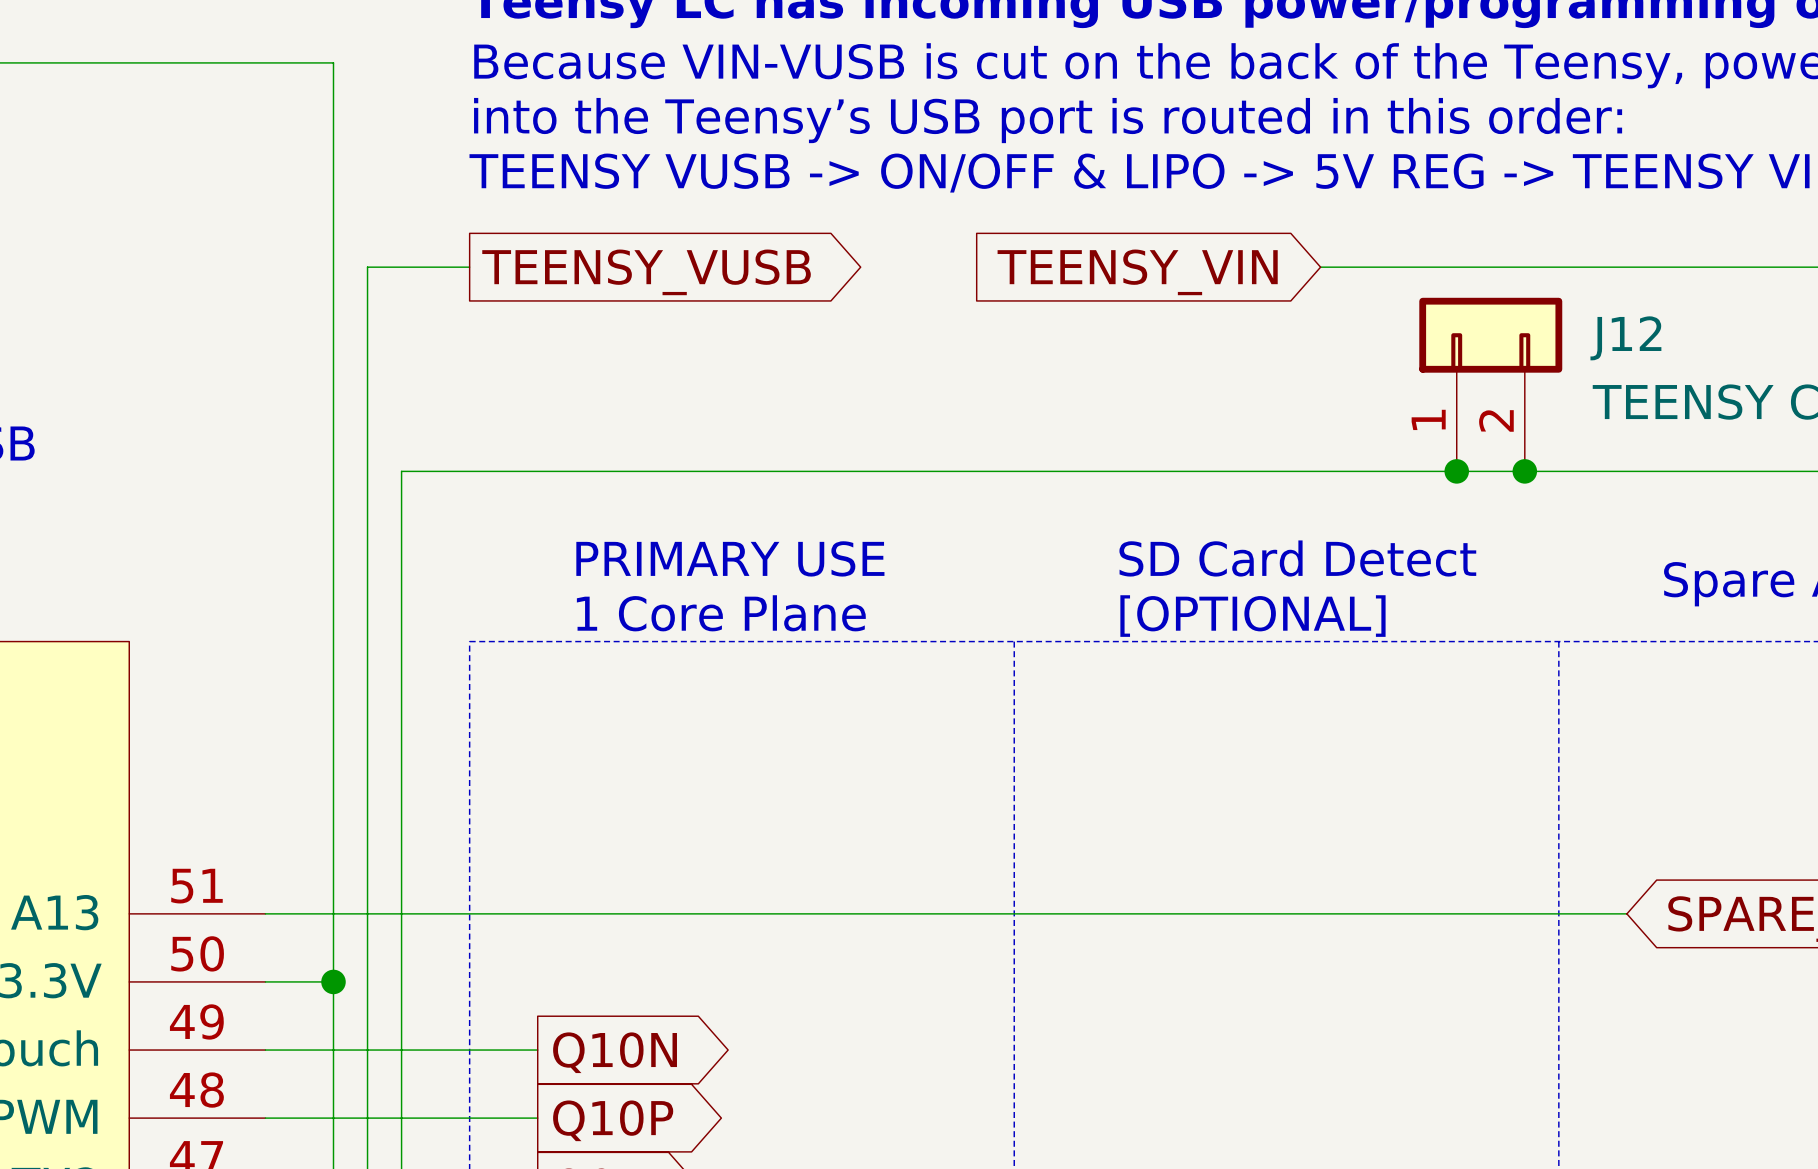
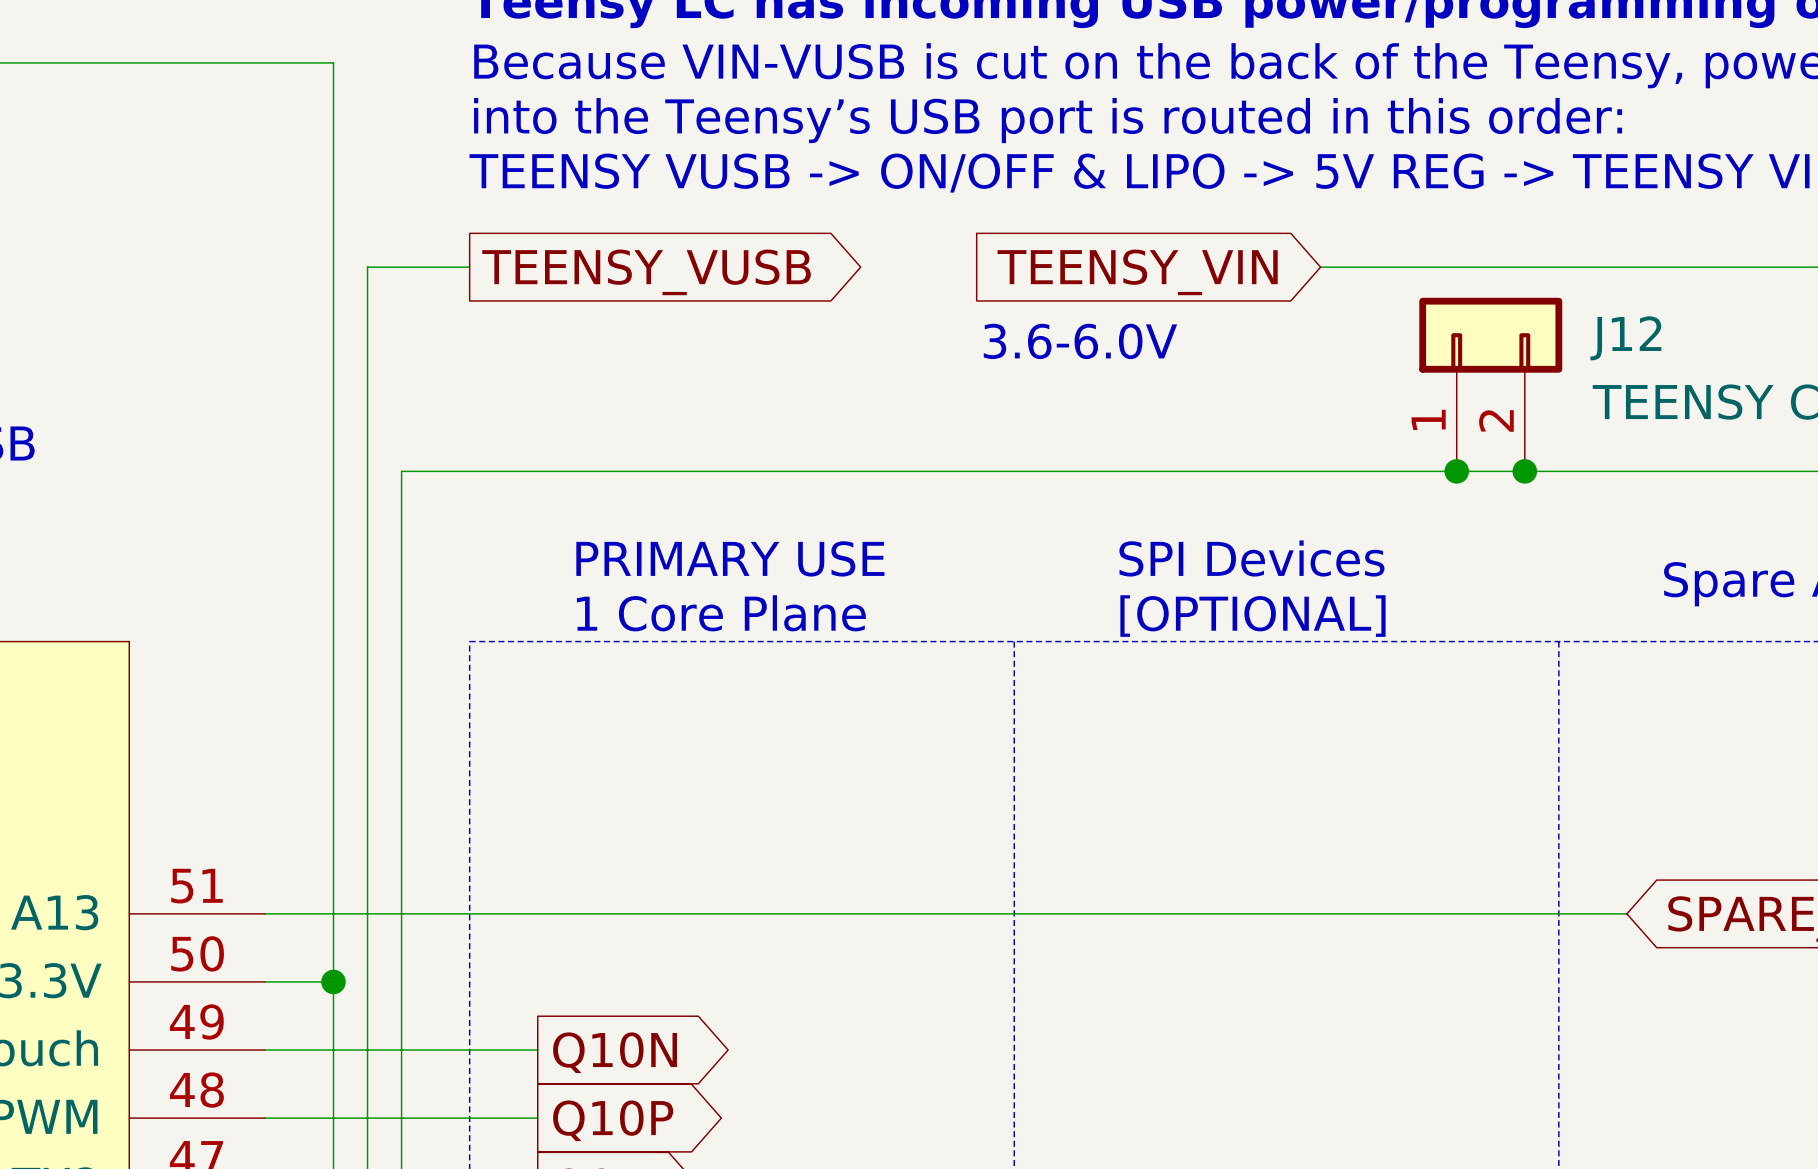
text: none -> 3.6-6.0V (1080, 341)
text: SD Card Detect (1297, 558) -> SPI Devices (1251, 558)

